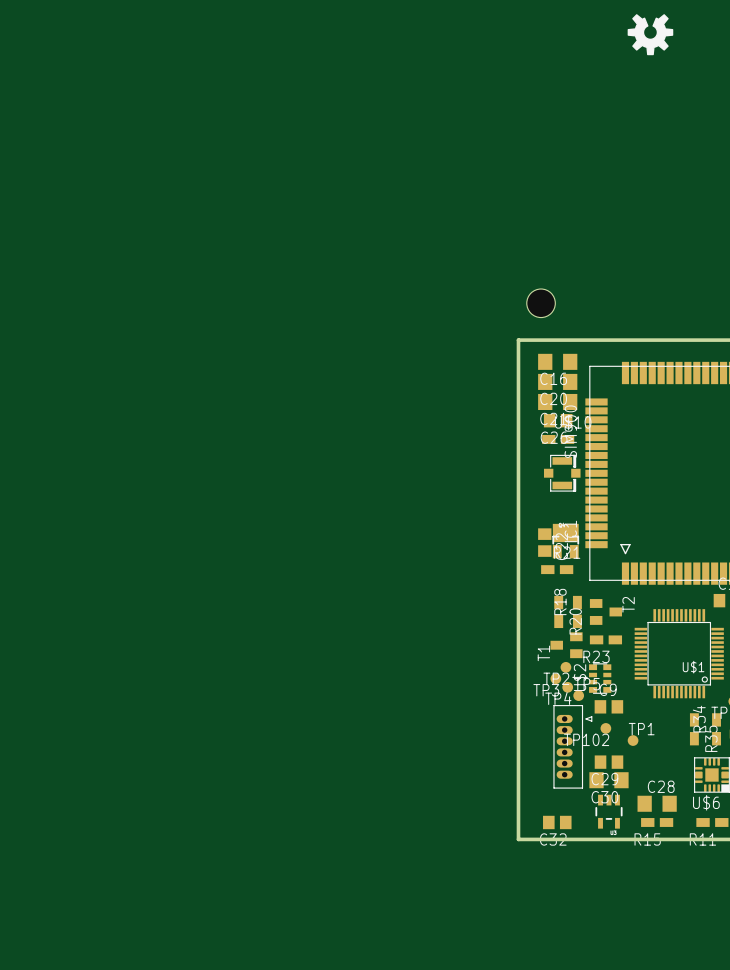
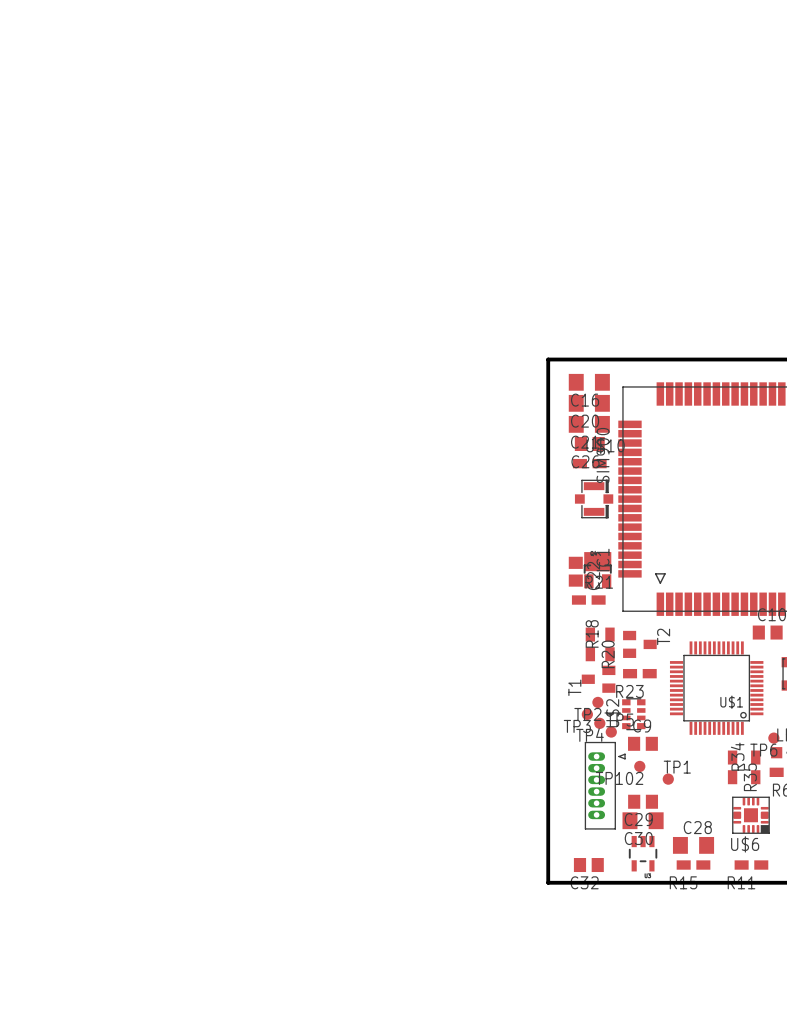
drawing: [627, 14, 674, 56] -> none
hole: (541, 303) -> none

